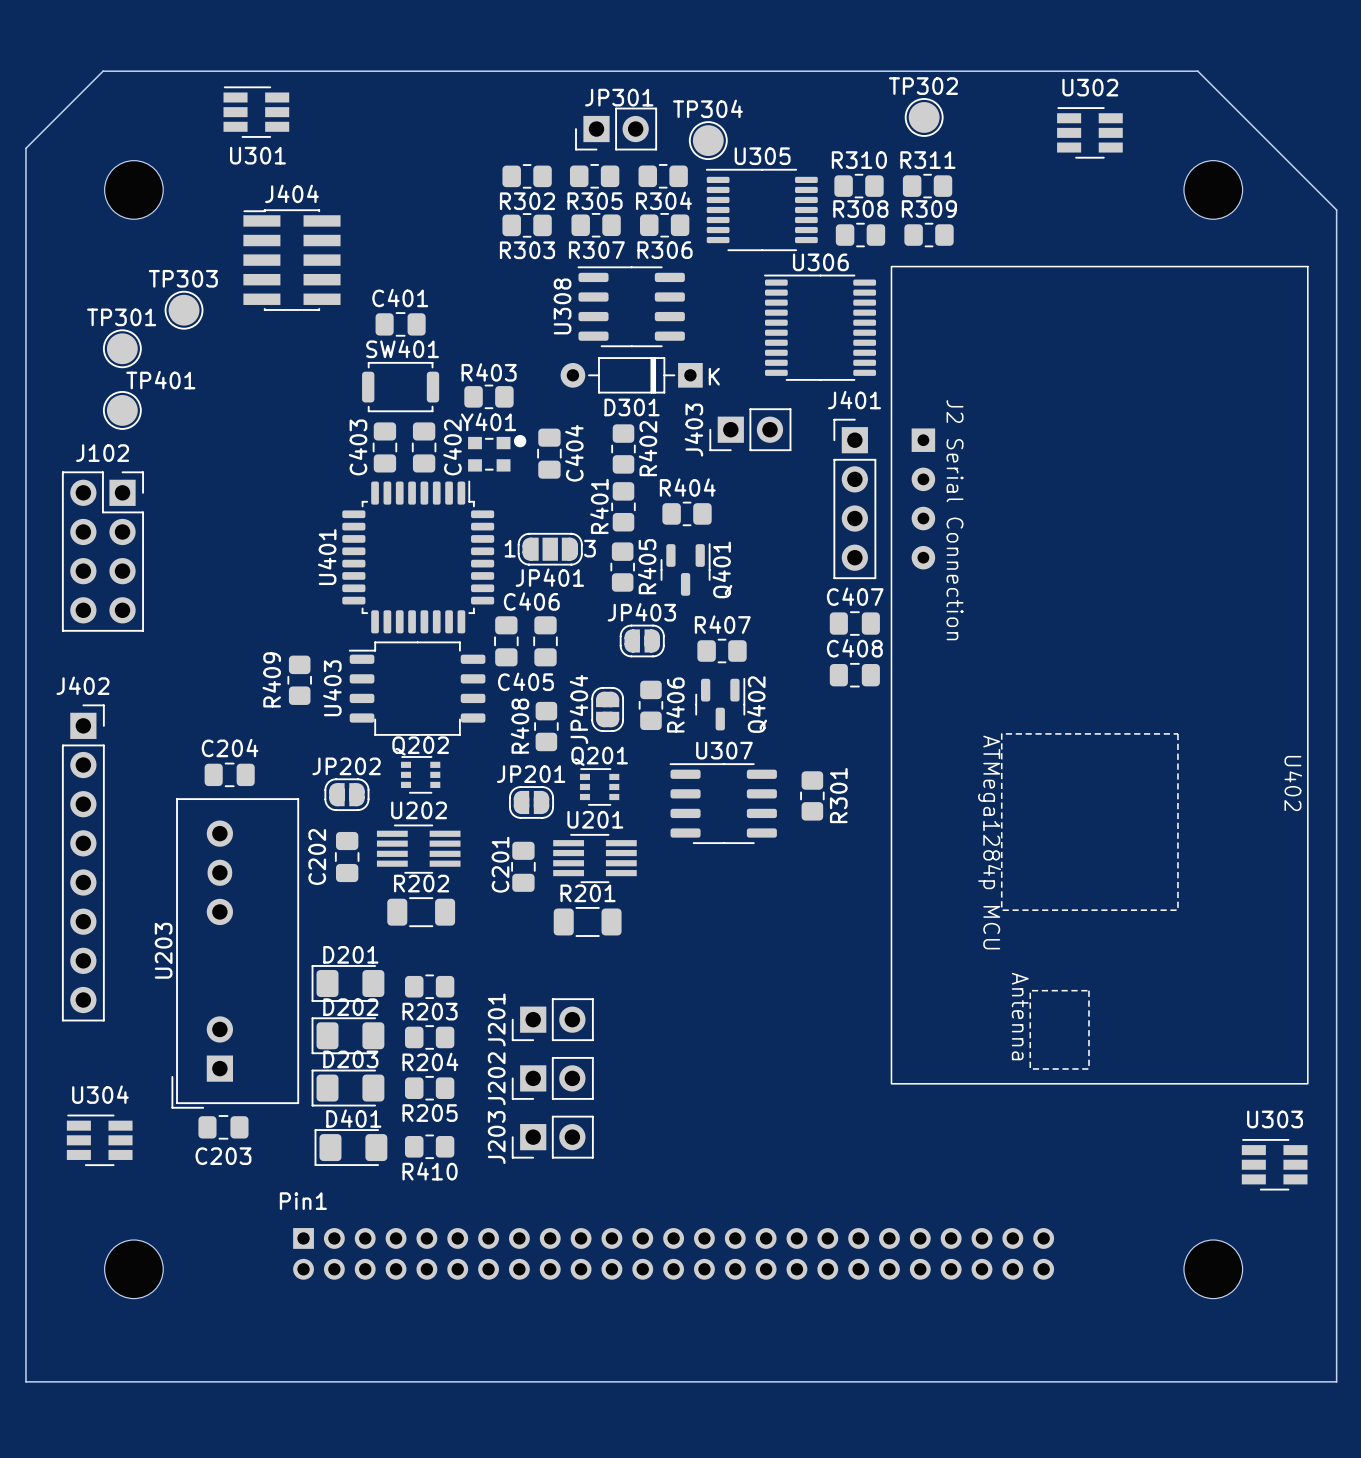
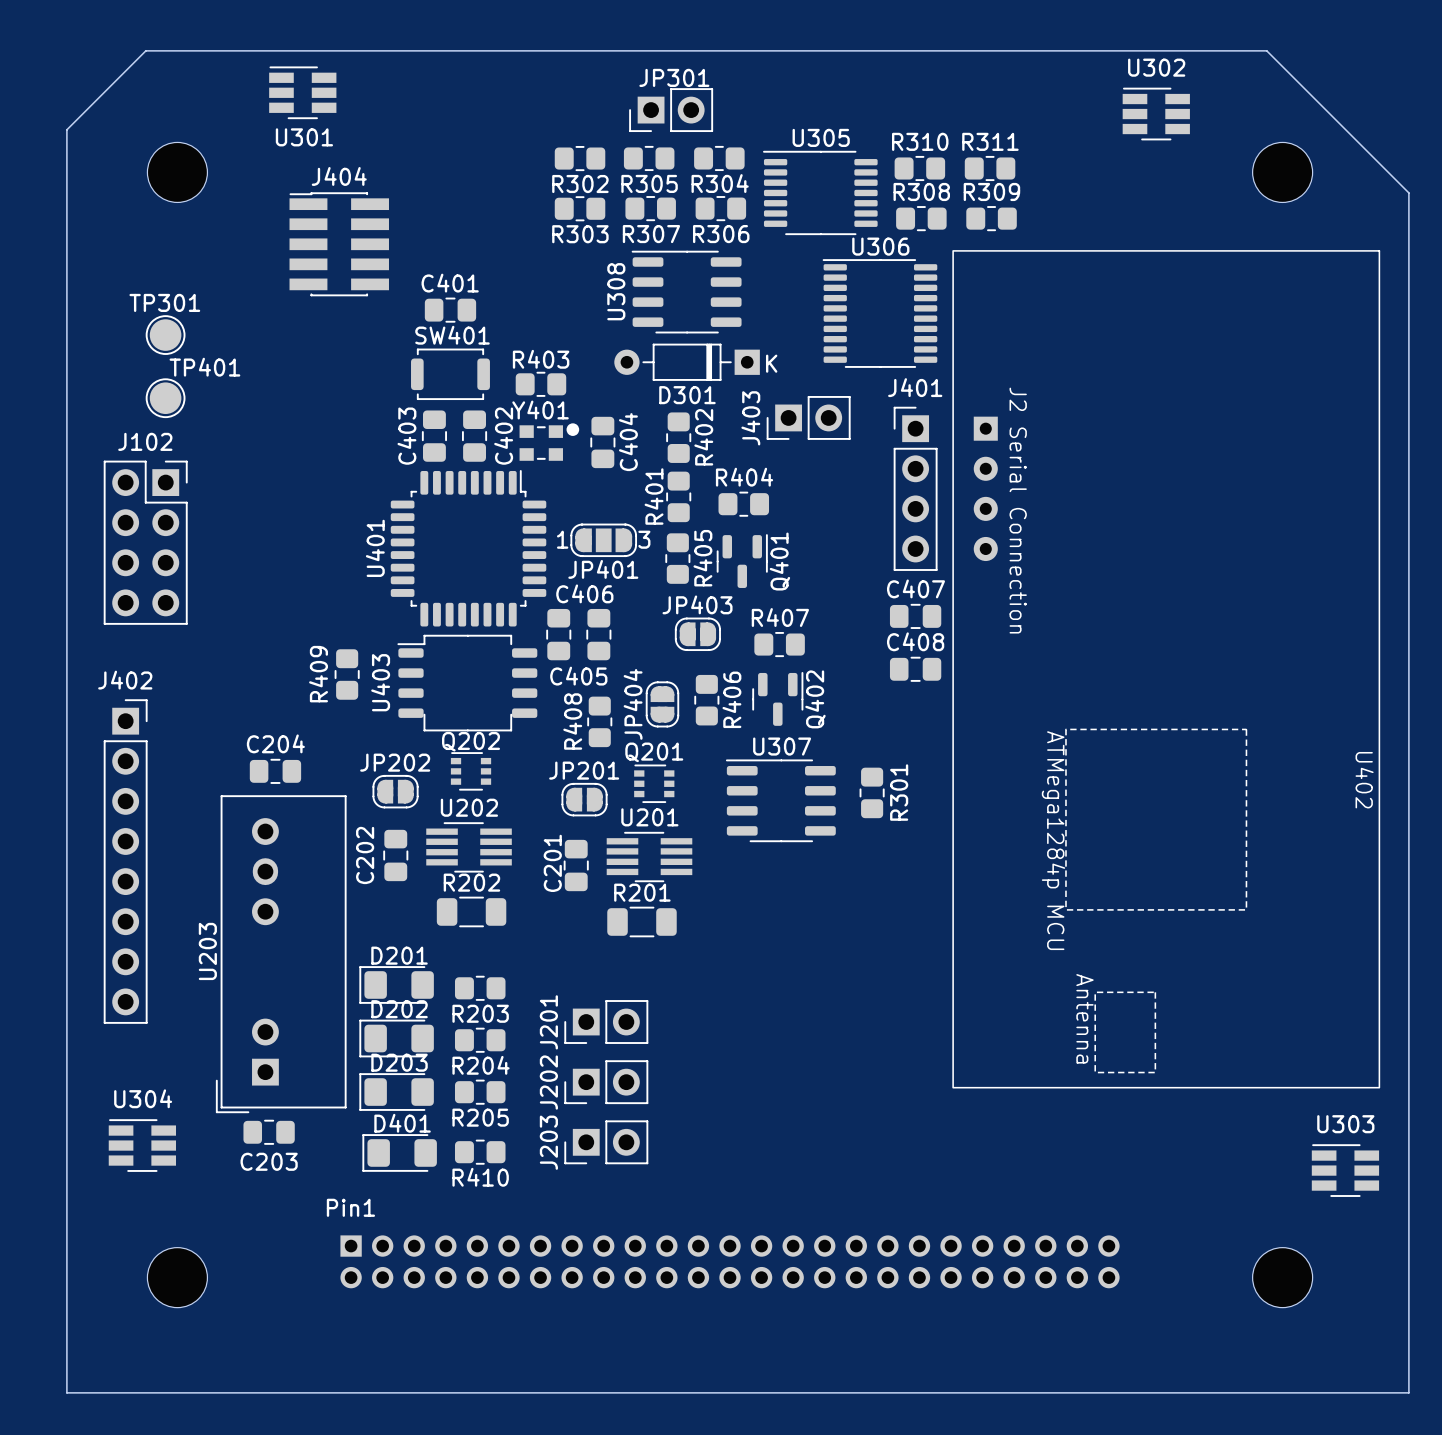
TP302: (924, 117) -> none
TP304: (708, 140) -> none
TP303: (184, 310) -> none

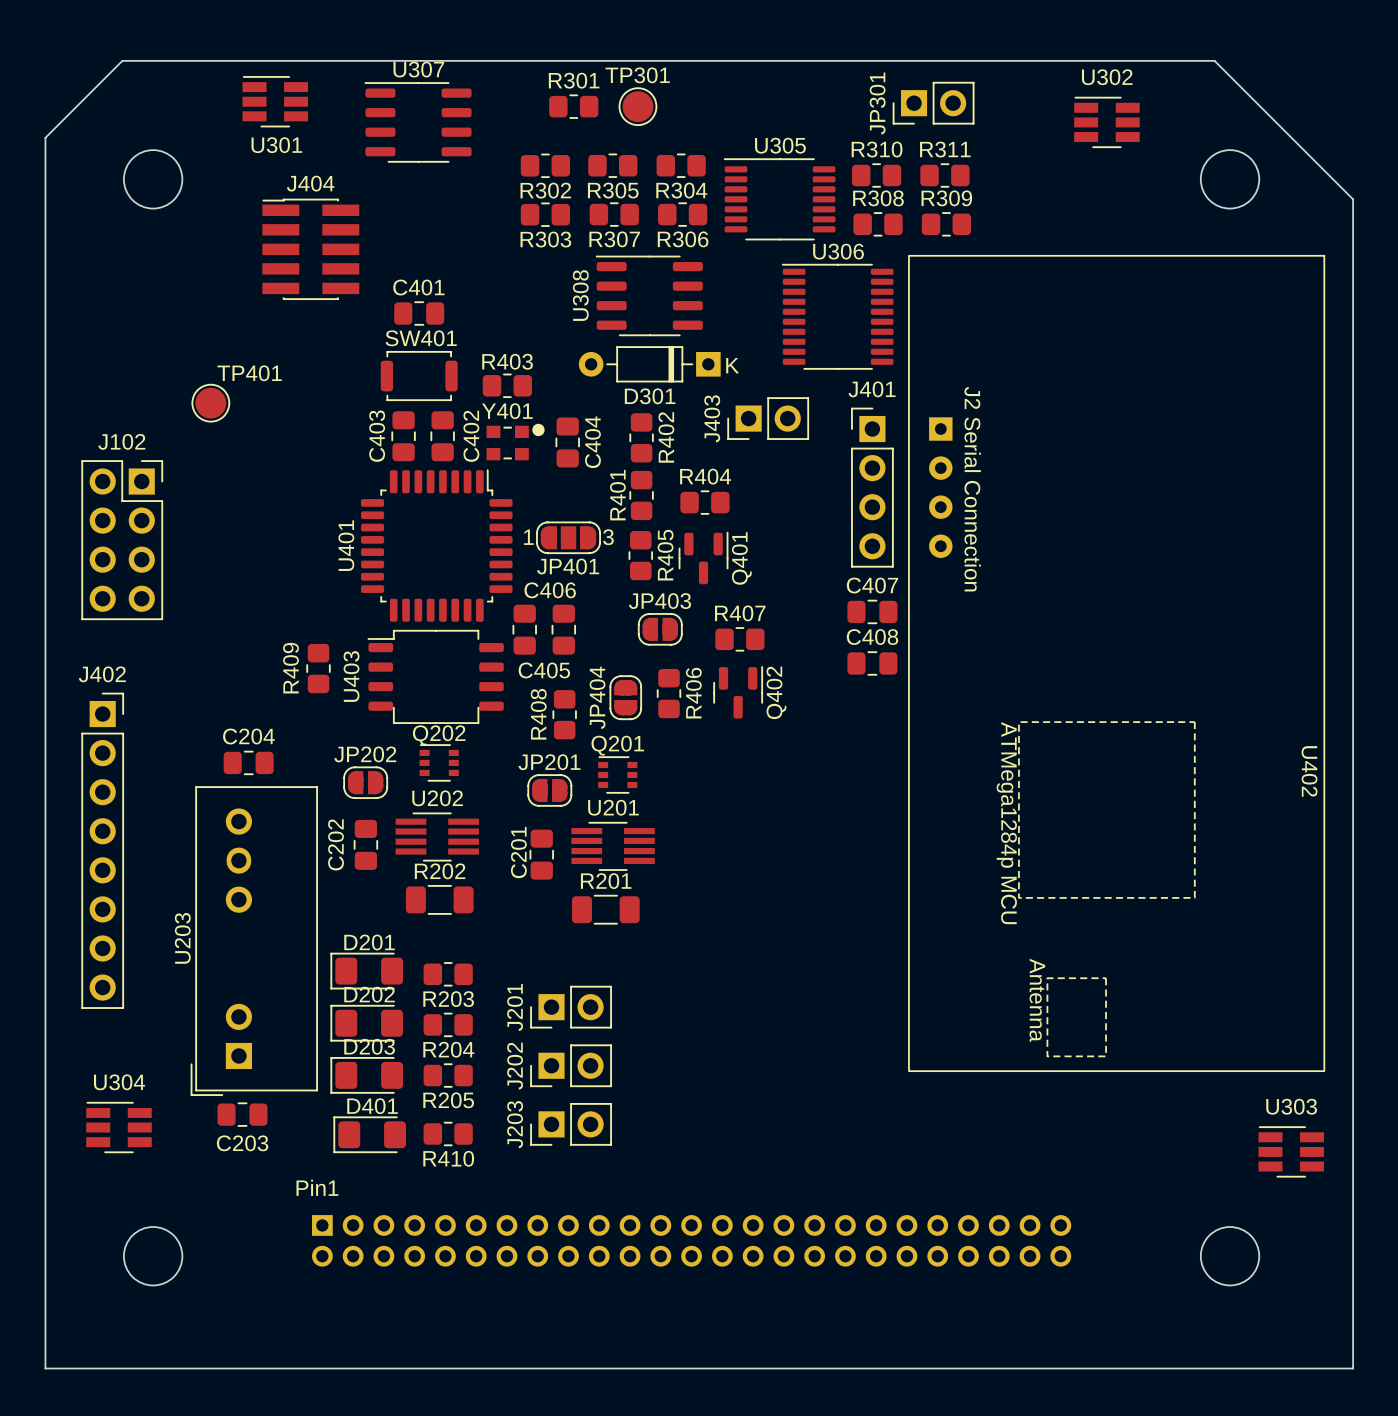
JP301 name rotation: 0° (674, 77) -> 90° counterclockwise (877, 103)
JP301 position: (671, 110) -> (933, 103)
TP301 position: (165, 335) -> (637, 106)
TP401 position: (165, 398) -> (210, 403)
R301 rotation: 0° (872, 792) -> 90° clockwise (573, 106)
R301 position: (872, 792) -> (573, 106)
R301 name position: R301 (899, 792) -> R301 (574, 80)
U307 position: (780, 800) -> (418, 122)

